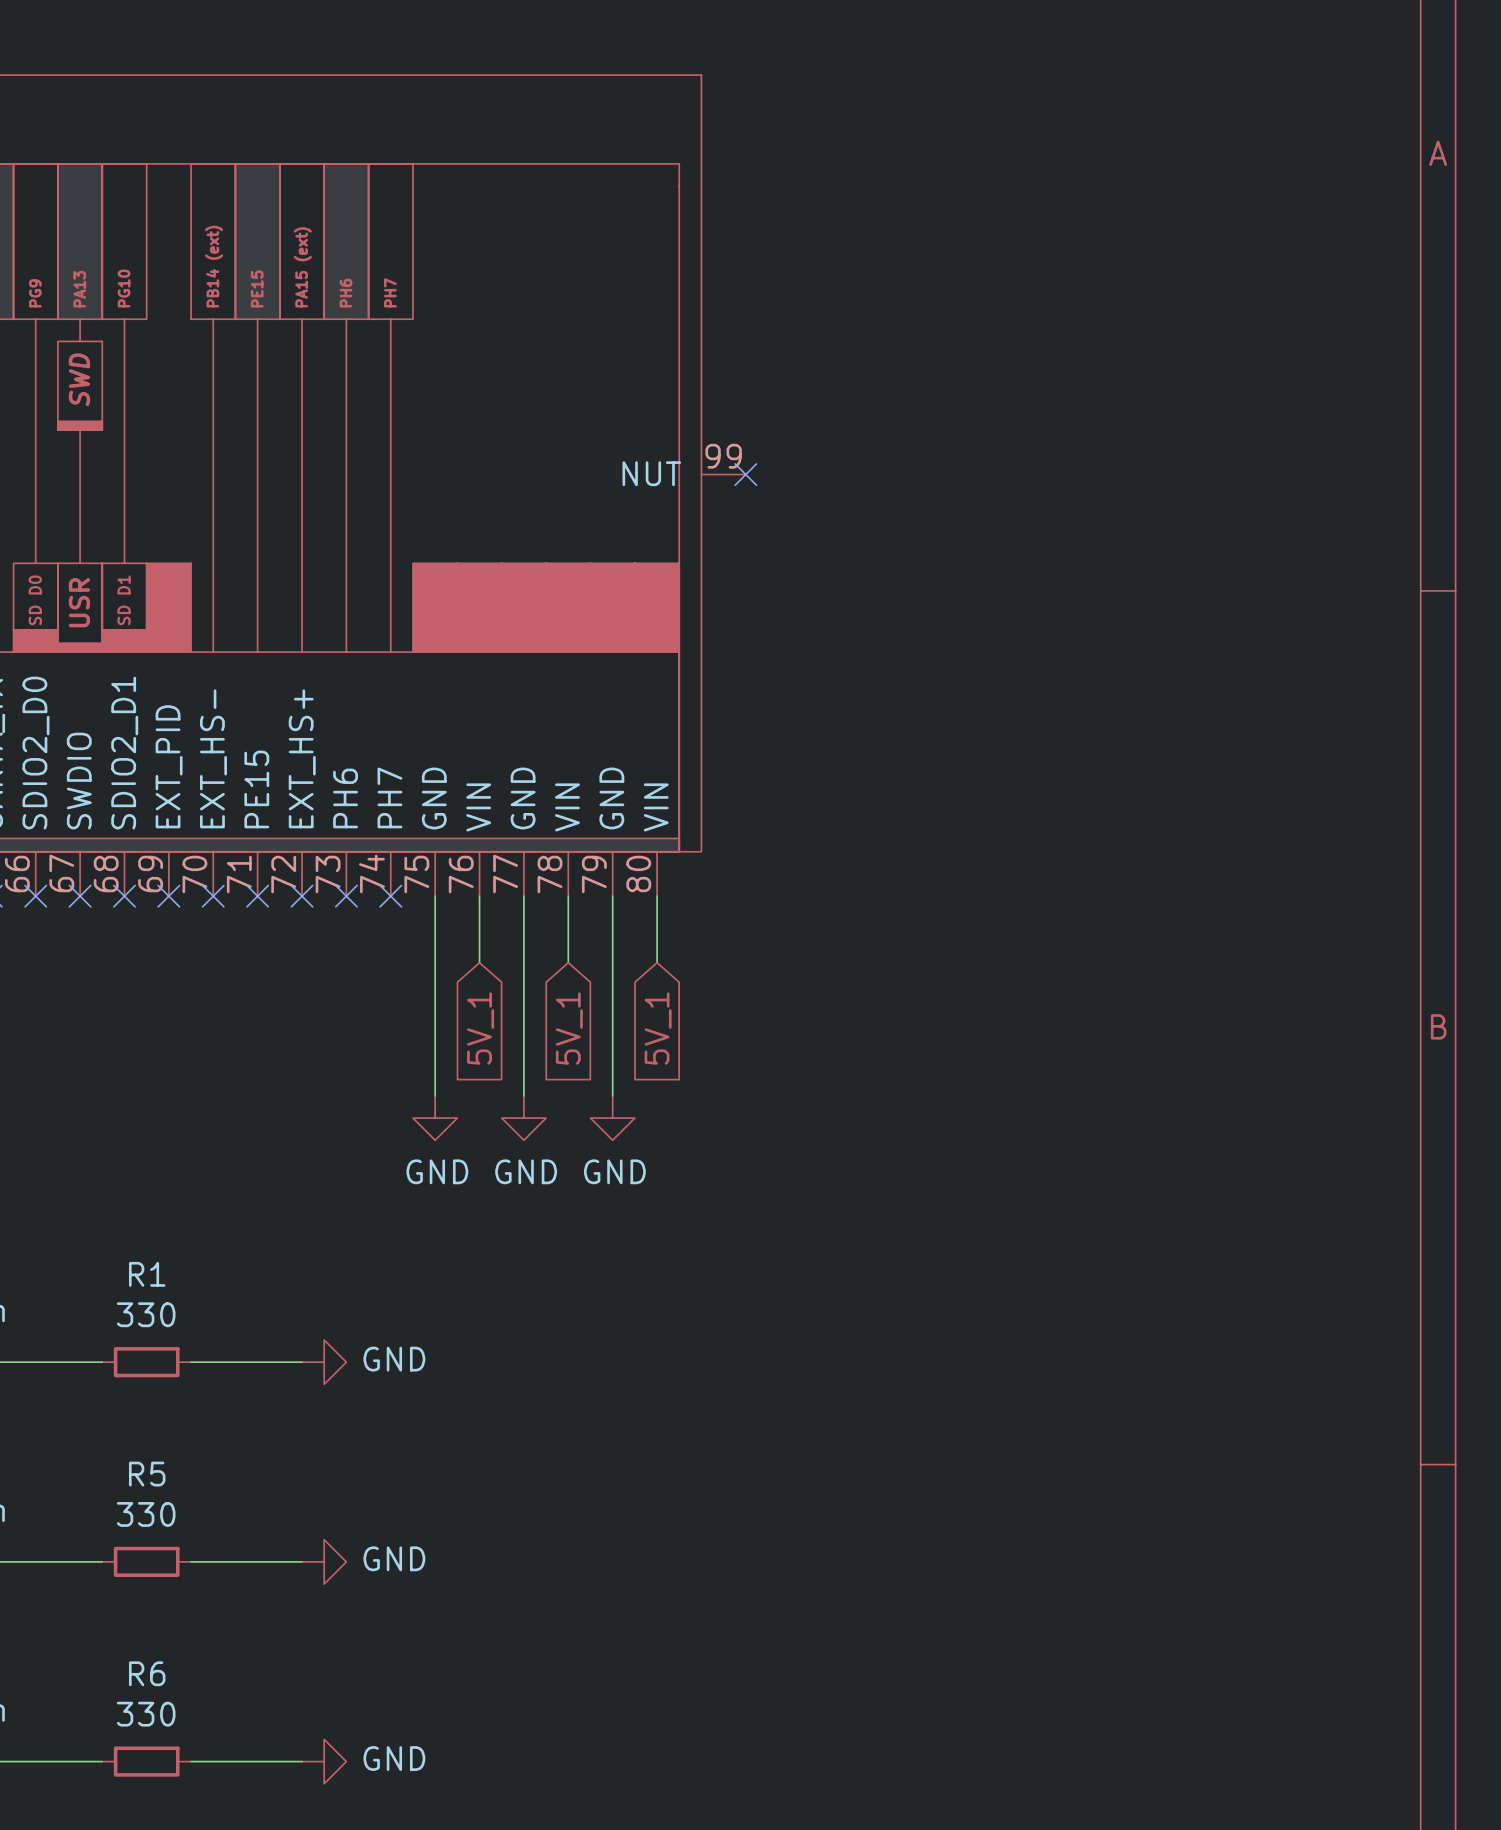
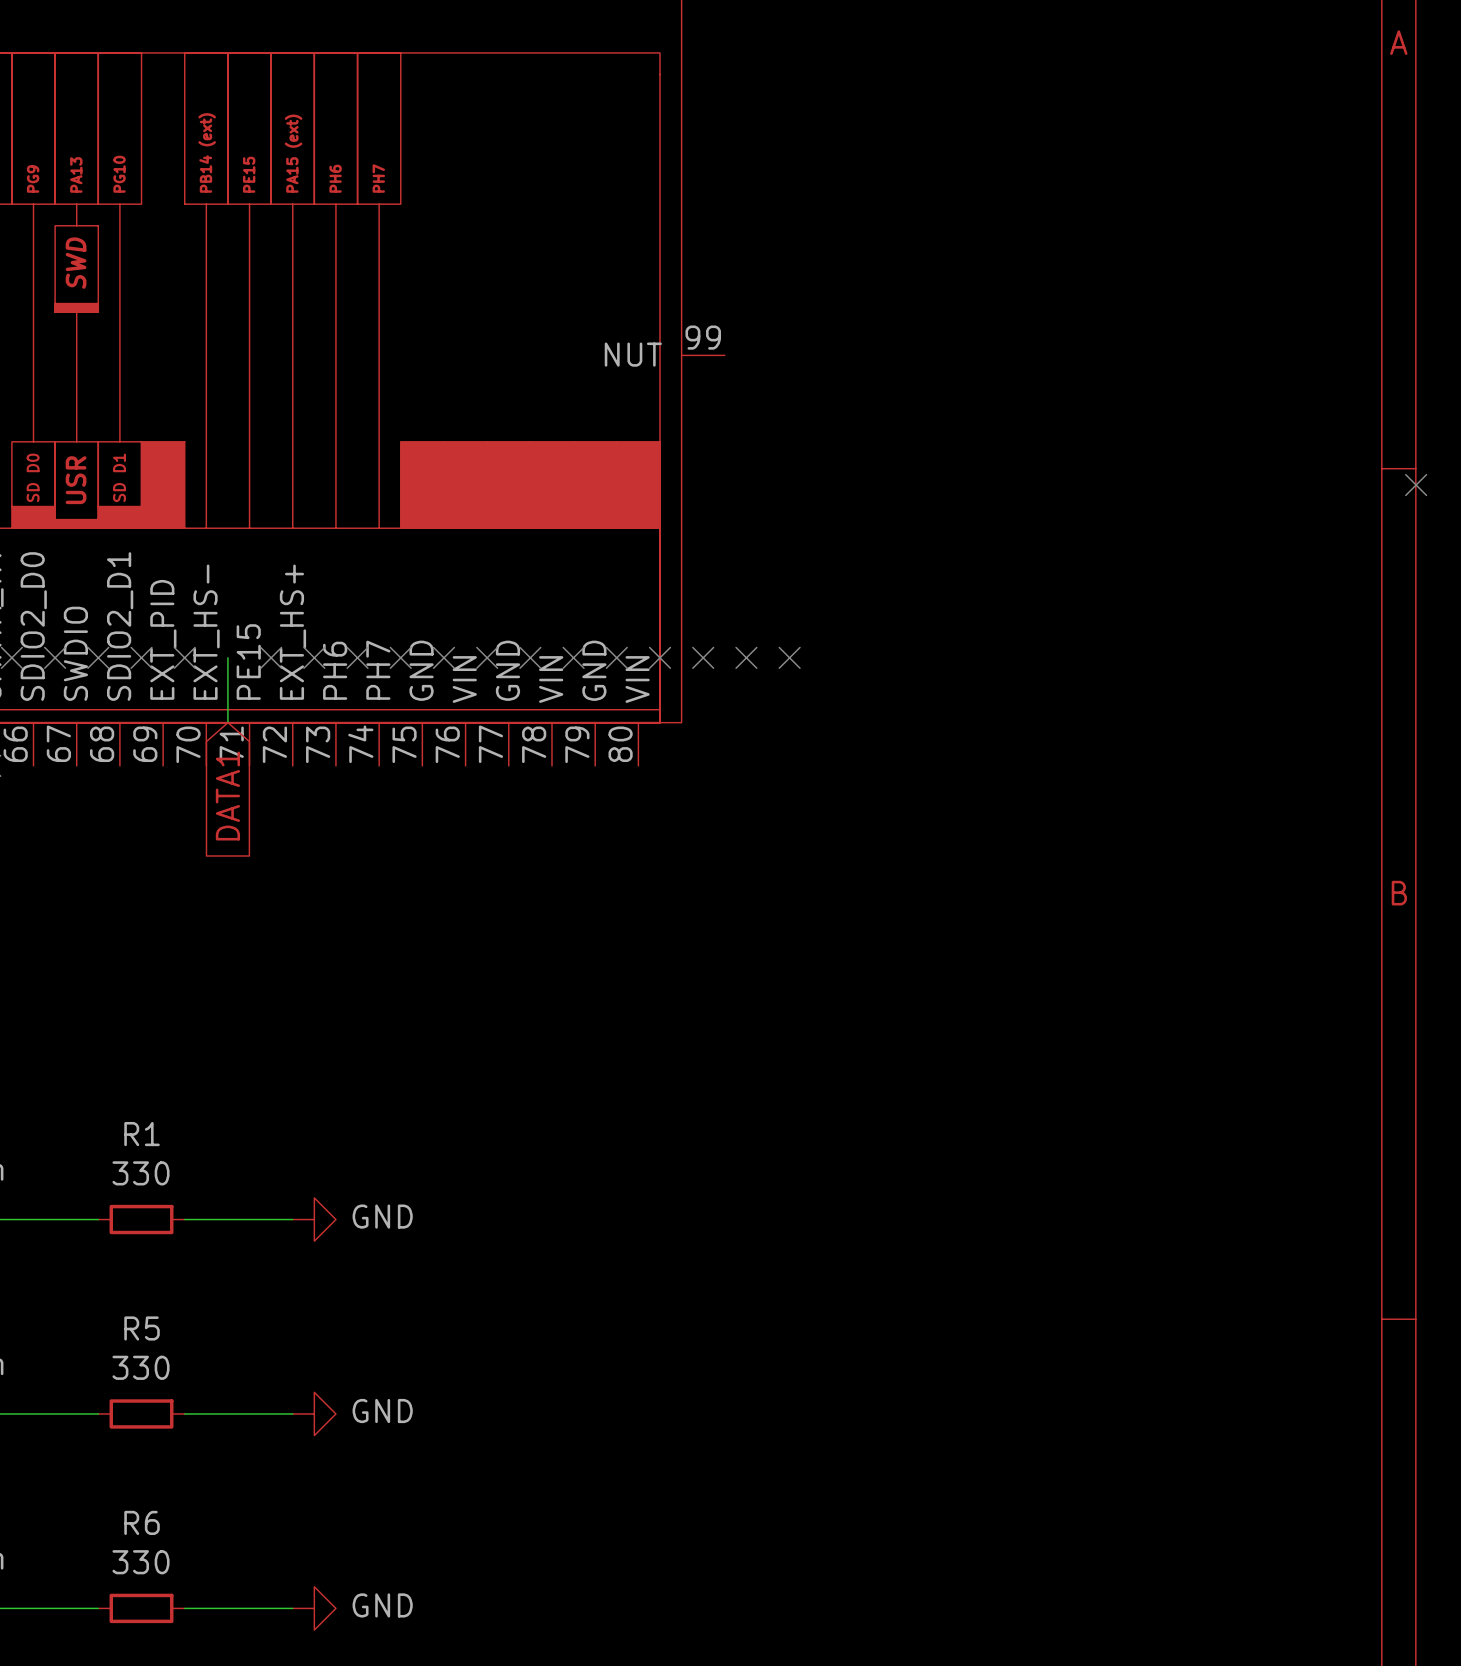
no-connect mark: (745, 474) -> none
no-connect mark: none -> (1416, 485)
no-connect mark: none -> (11, 657)
no-connect mark: none -> (55, 657)
no-connect mark: none -> (98, 657)
no-connect mark: none -> (141, 657)
no-connect mark: none -> (184, 657)
no-connect mark: none -> (271, 657)
no-connect mark: none -> (314, 657)
no-connect mark: none -> (357, 657)
no-connect mark: none -> (400, 657)
no-connect mark: none -> (443, 657)
no-connect mark: none -> (487, 657)
no-connect mark: none -> (530, 657)
no-connect mark: none -> (573, 657)
no-connect mark: none -> (616, 657)
no-connect mark: none -> (660, 657)
no-connect mark: none -> (703, 657)
no-connect mark: none -> (746, 657)
no-connect mark: none -> (789, 657)
no-connect mark: (35, 896) -> none
no-connect mark: (80, 896) -> none
no-connect mark: (124, 896) -> none
no-connect mark: (168, 896) -> none
no-connect mark: (213, 896) -> none
no-connect mark: (257, 896) -> none
no-connect mark: (302, 896) -> none
no-connect mark: (346, 896) -> none
no-connect mark: (390, 896) -> none
wire: (435, 896) (435, 1095) -> none
wire: (479, 896) (479, 962) -> none
wire: (523, 896) (523, 1095) -> none
wire: (568, 896) (568, 962) -> (227, 657) (227, 722)
wire: (612, 896) (612, 1095) -> none
wire: (657, 896) (657, 962) -> none
global label: none -> DATA1 (227, 795)
global label: 5V_1 (480, 1028) -> none
global label: 5V_1 (569, 1028) -> none
global label: 5V_1 (658, 1028) -> none
power symbol: GND (435, 1118) -> none
power symbol: GND (523, 1118) -> none
power symbol: GND (612, 1118) -> none

